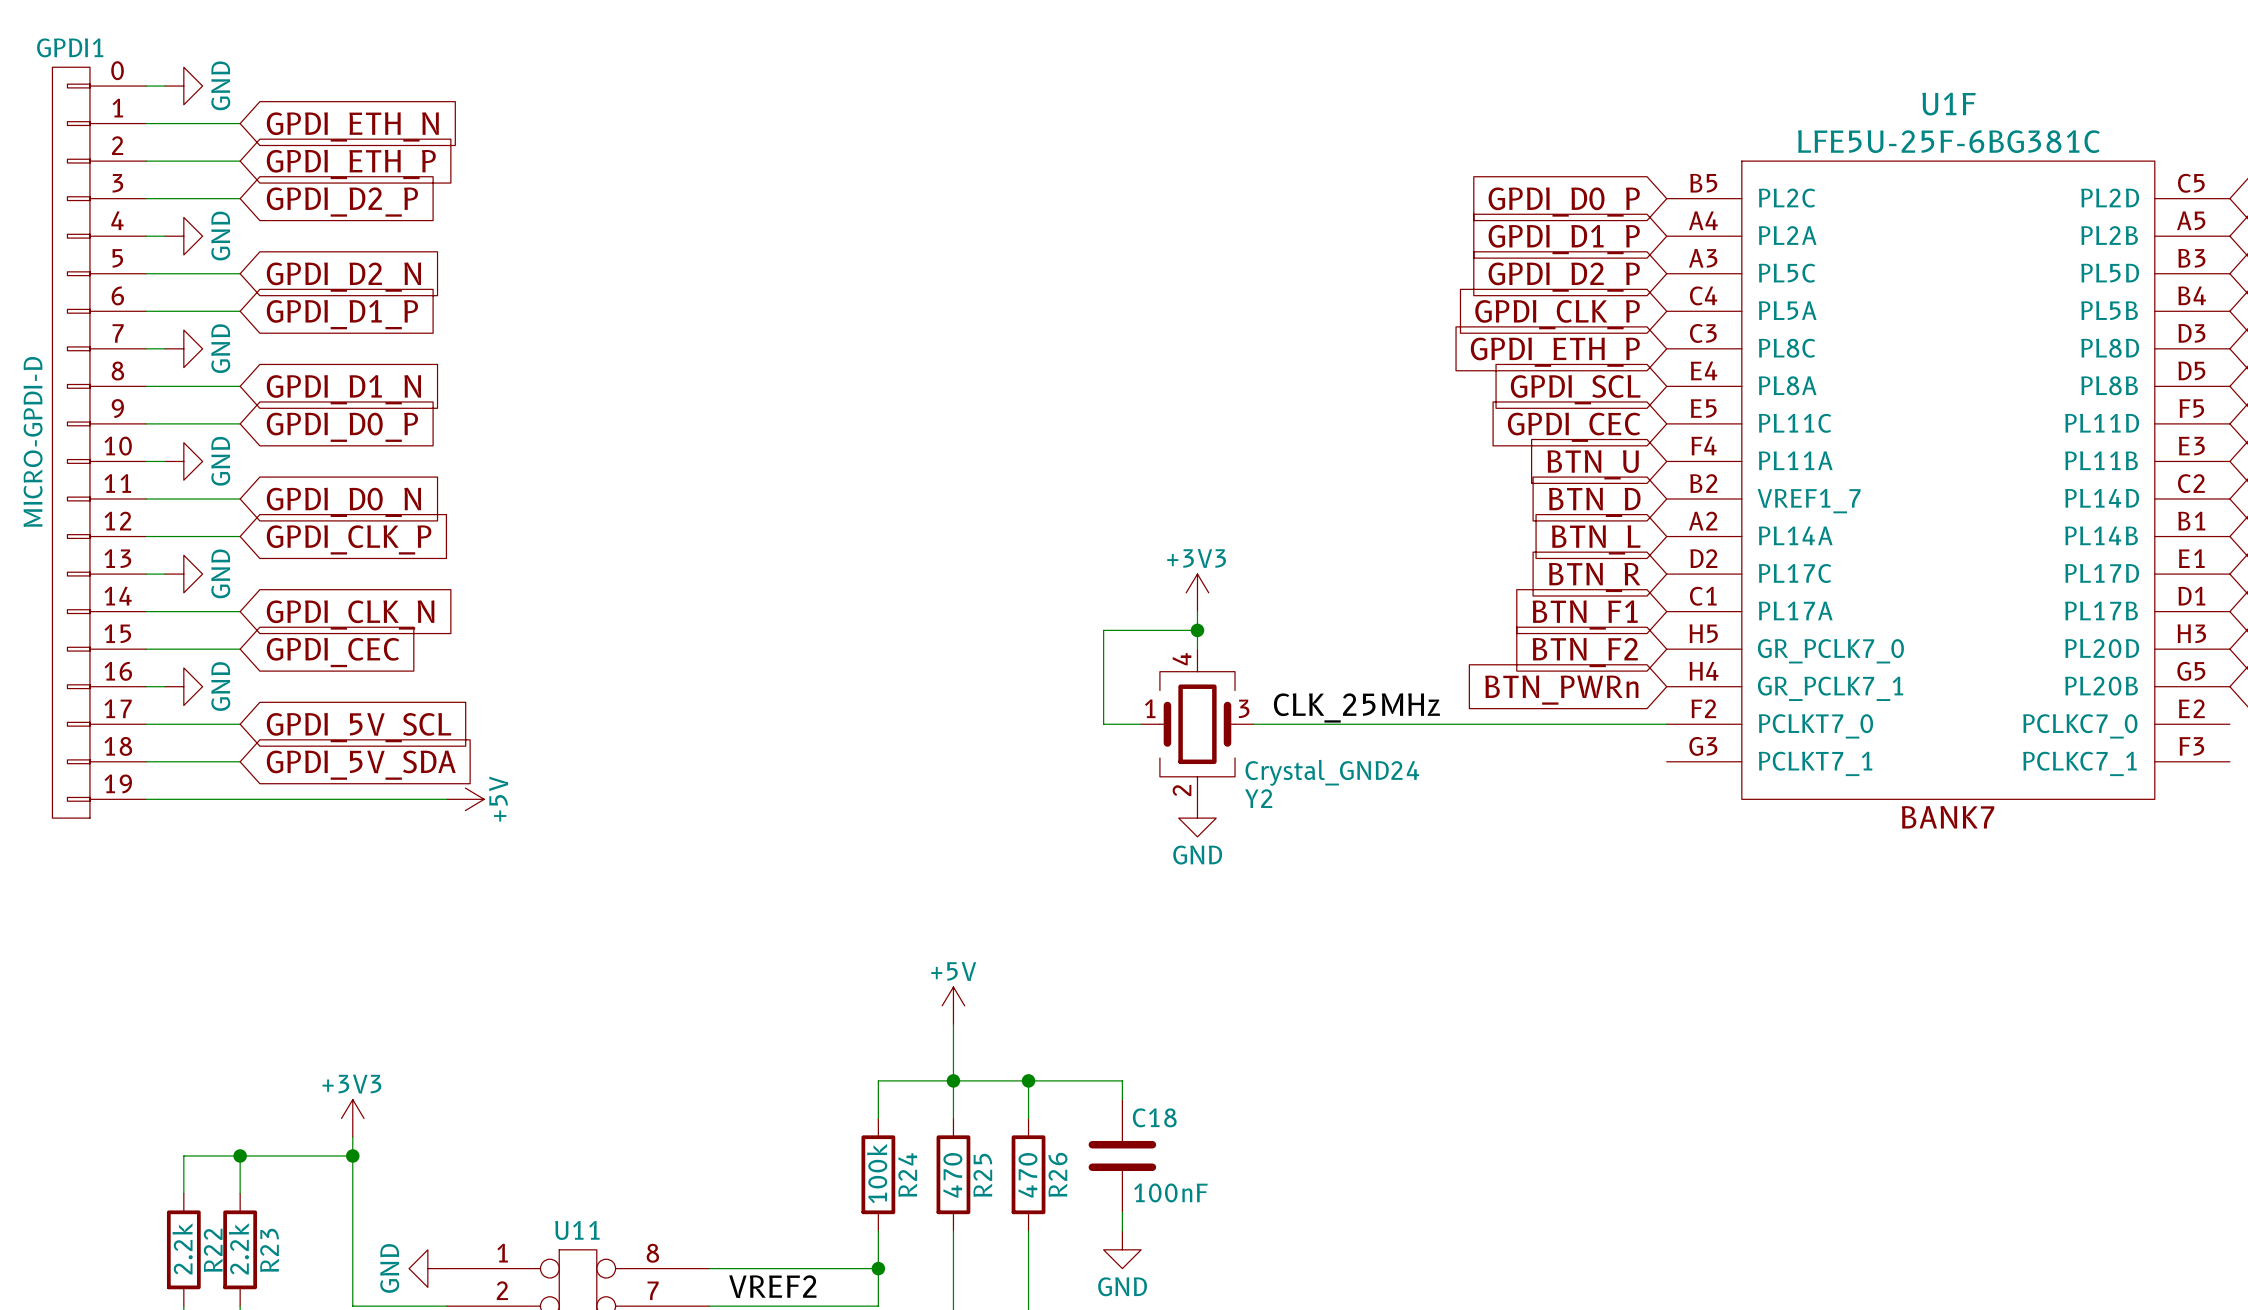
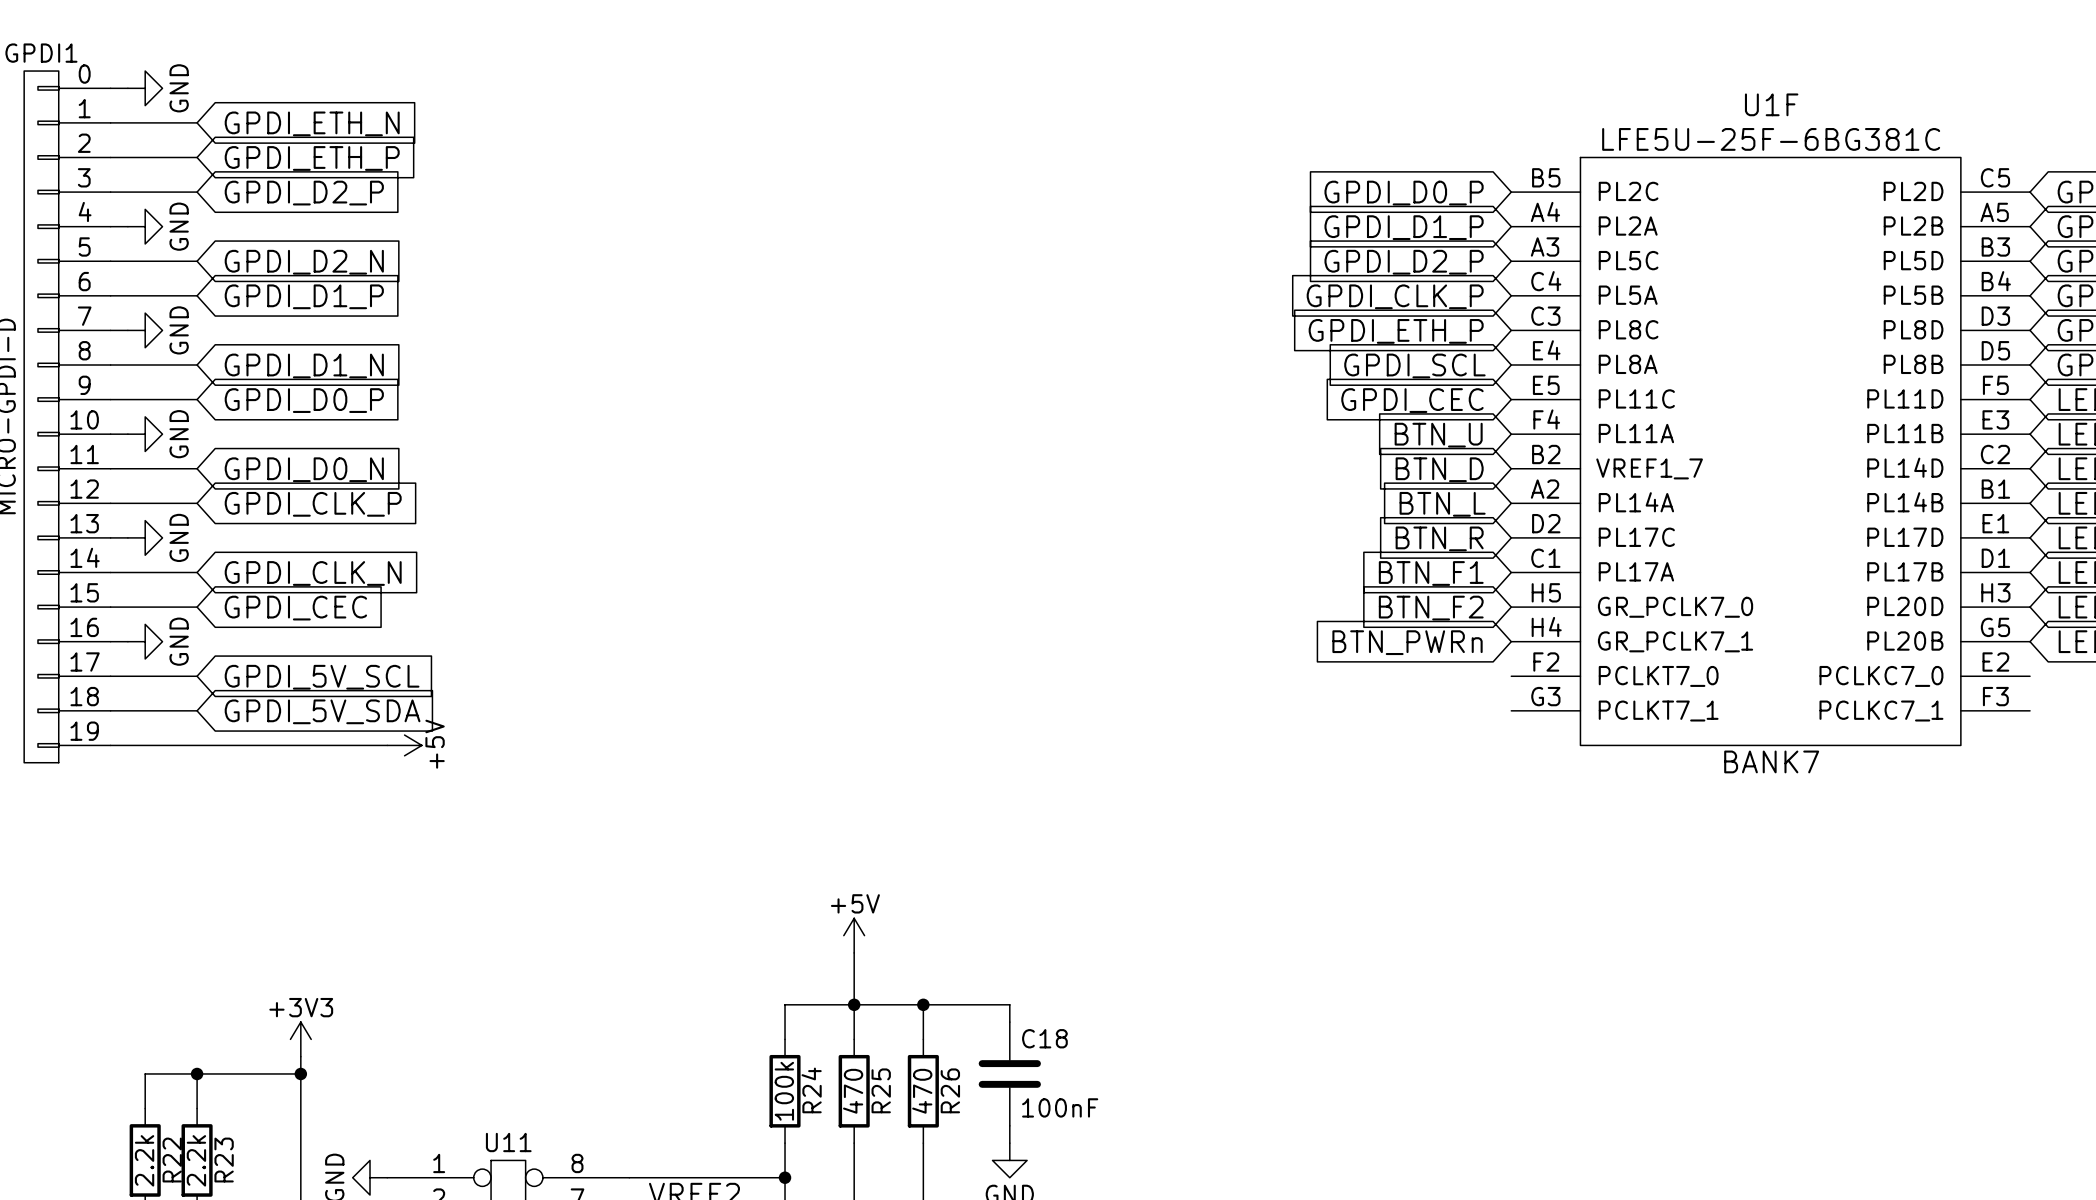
power symbol: +3V3 (1197, 592) -> none
wire: (1197, 611) (1197, 649) -> none
wire: (1197, 630) (1103, 630) (1103, 724) (1141, 724) -> none
junction: (1197, 630) -> none
label: CLK_25MHz (1356, 707) -> none
Y2: Crystal_GND24 (1197, 724) -> none
wire: (1253, 724) (1666, 724) -> none
power symbol: GND (1197, 818) -> none

